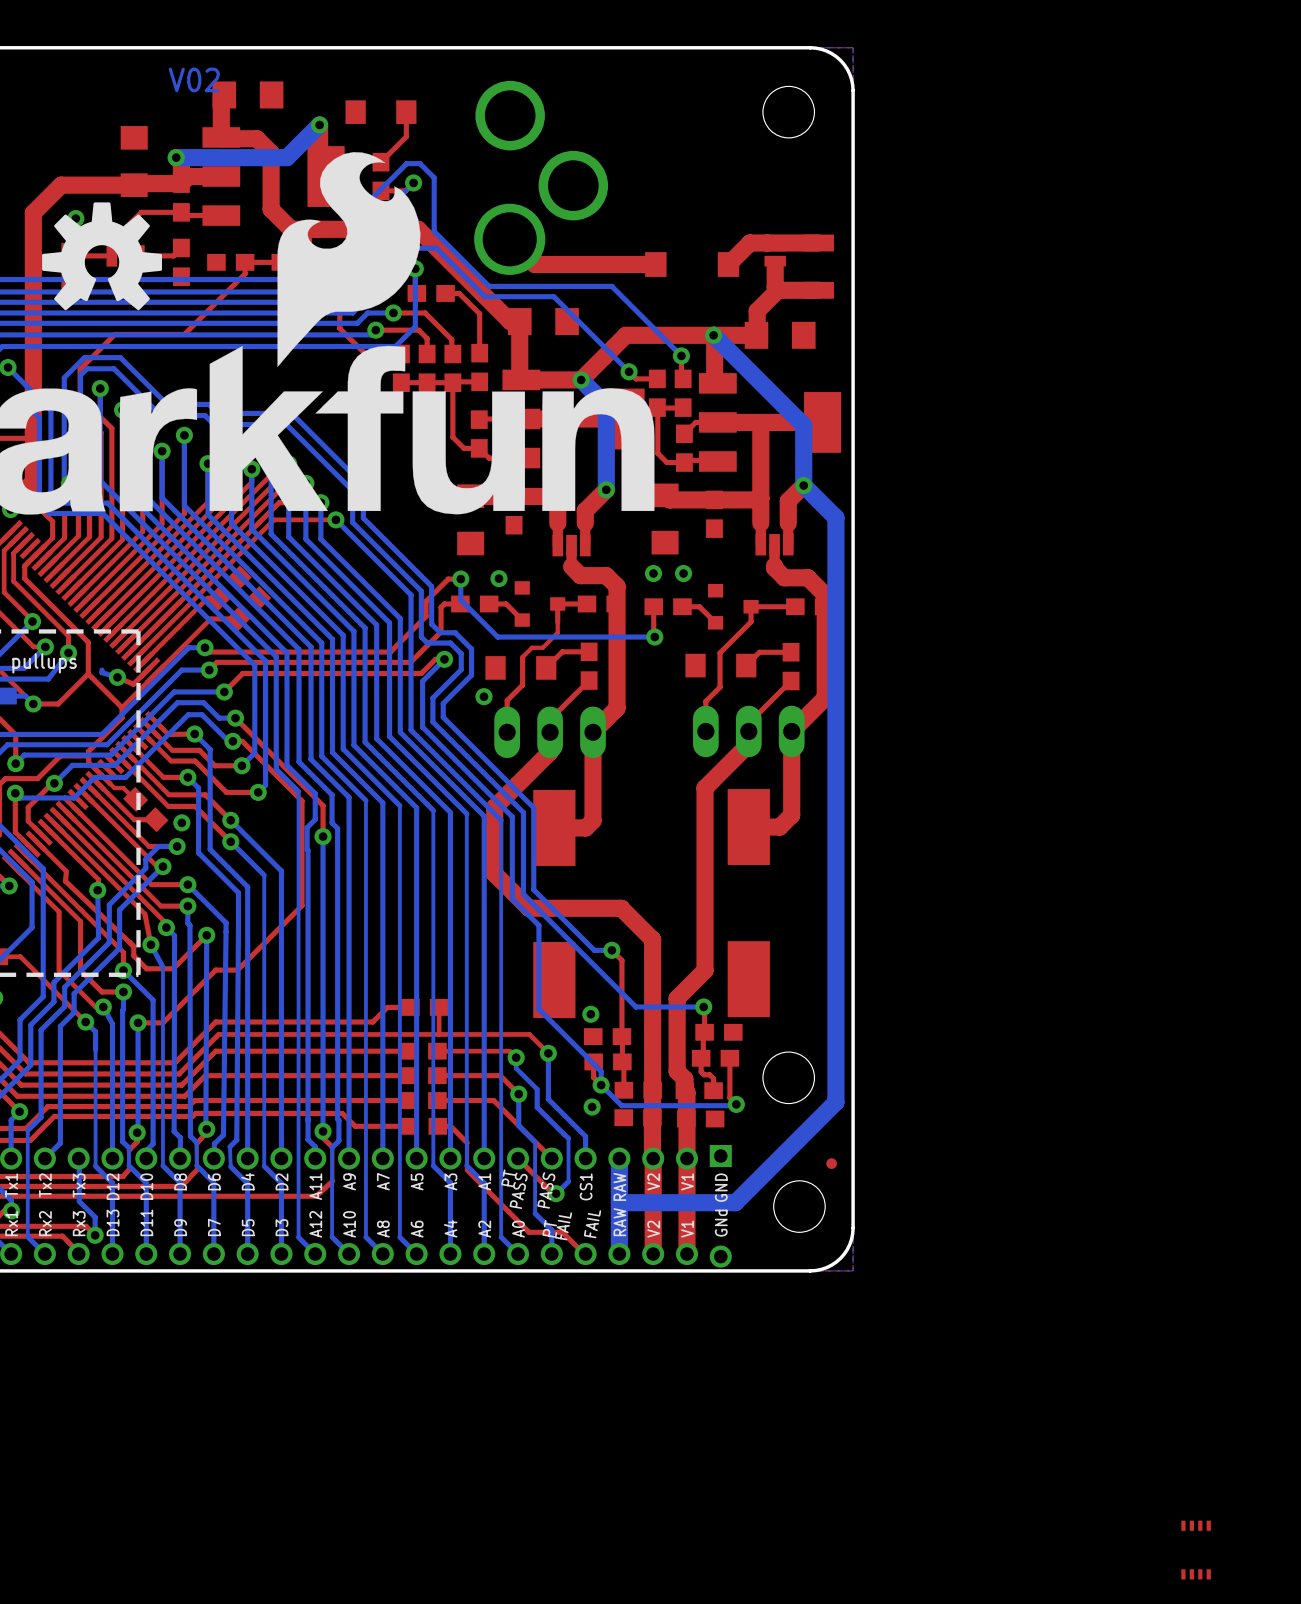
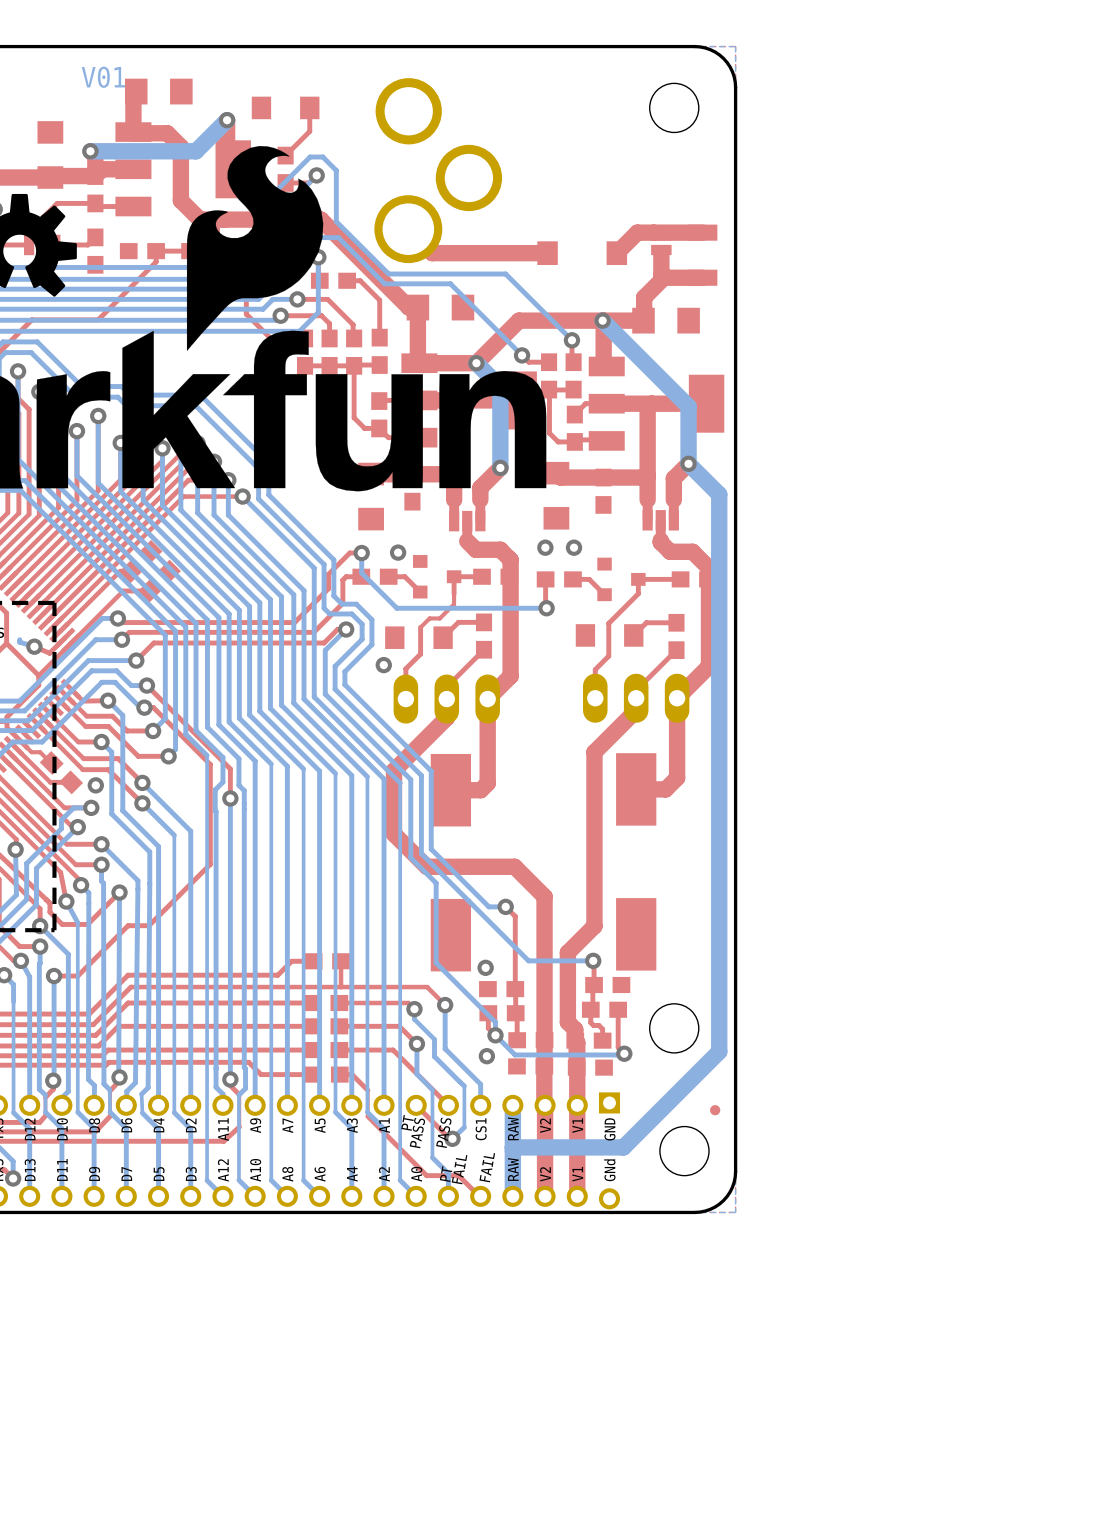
text: V02 (194, 79) -> V01 (103, 77)
part: (1196, 1550) -> none

